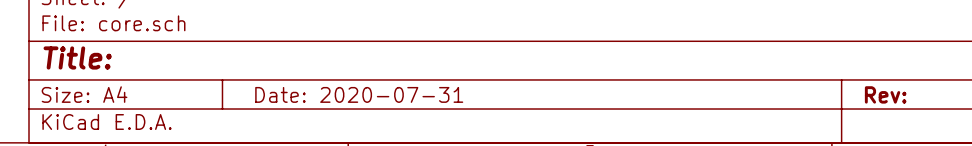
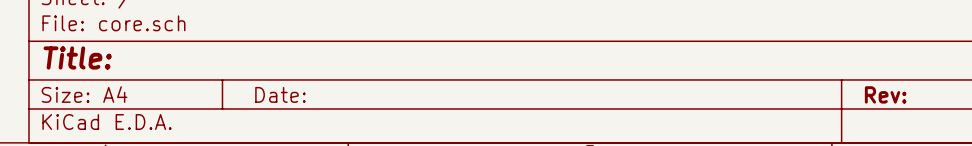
title block: Date: 2020-07-31 (359, 94) -> Date: (280, 94)

